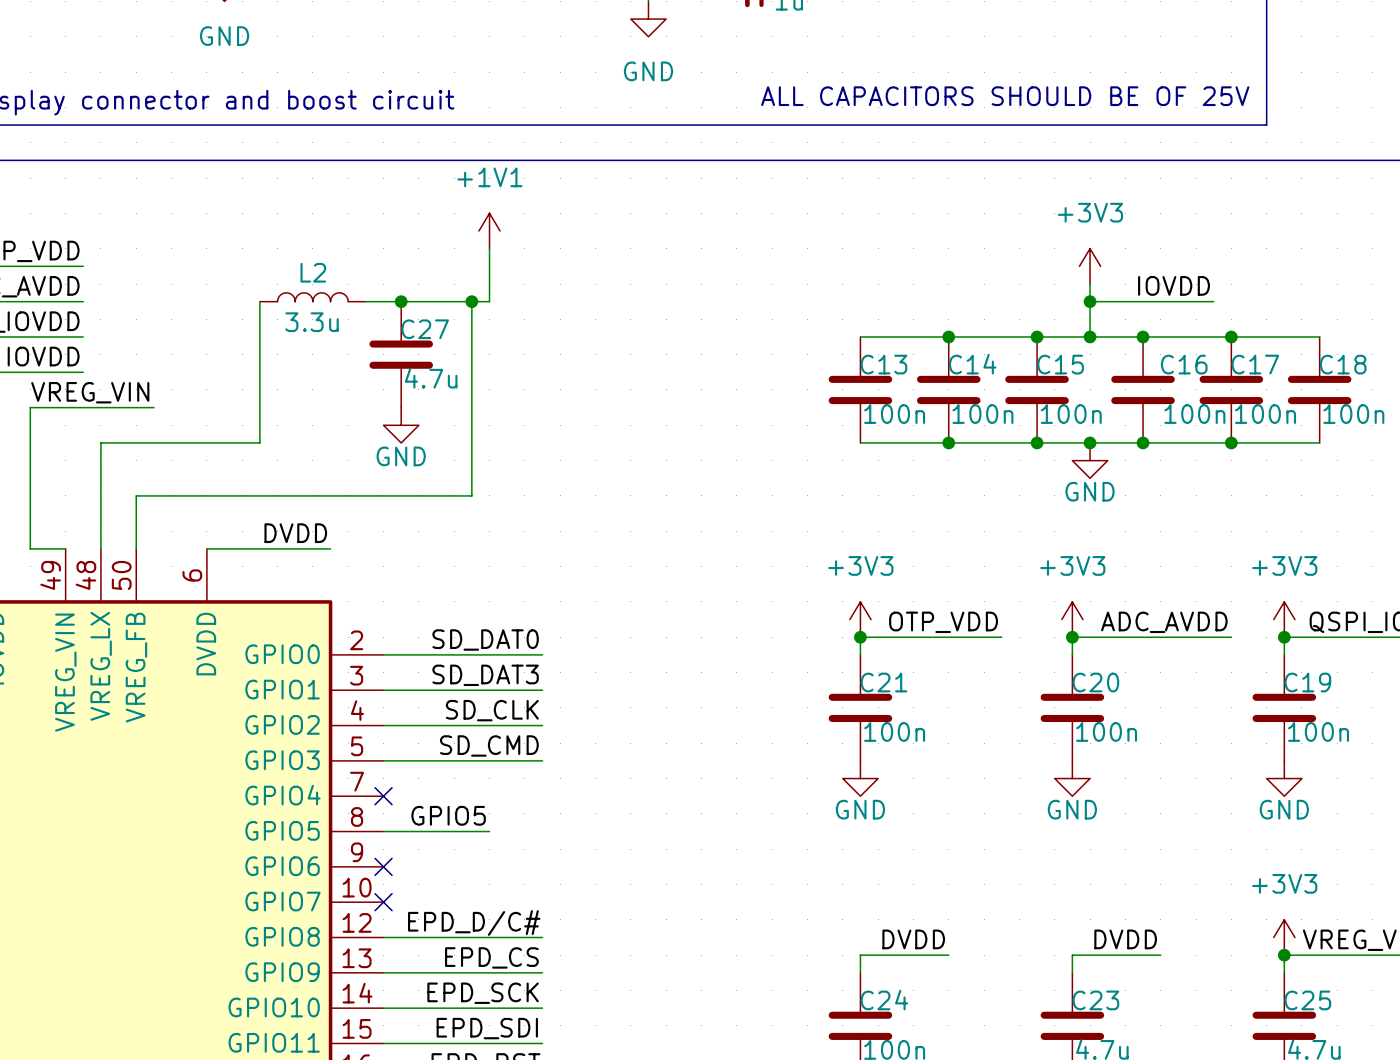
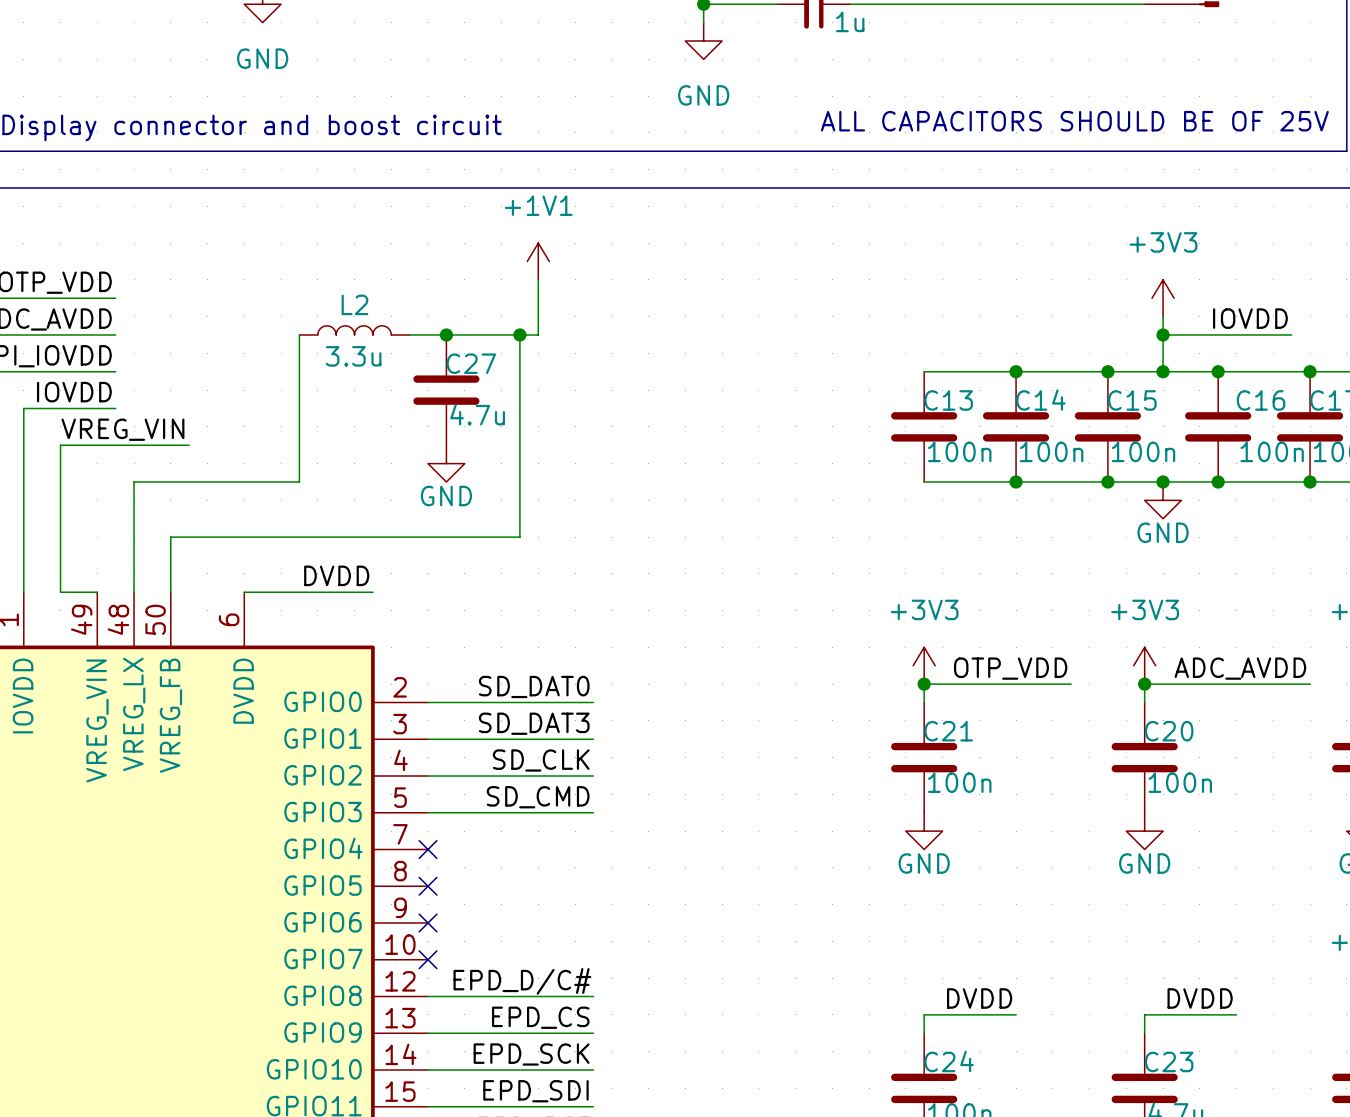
label: GPIO5 (448, 815) -> none
wire: (383, 831) (489, 831) -> none
no-connect mark: none -> (428, 886)

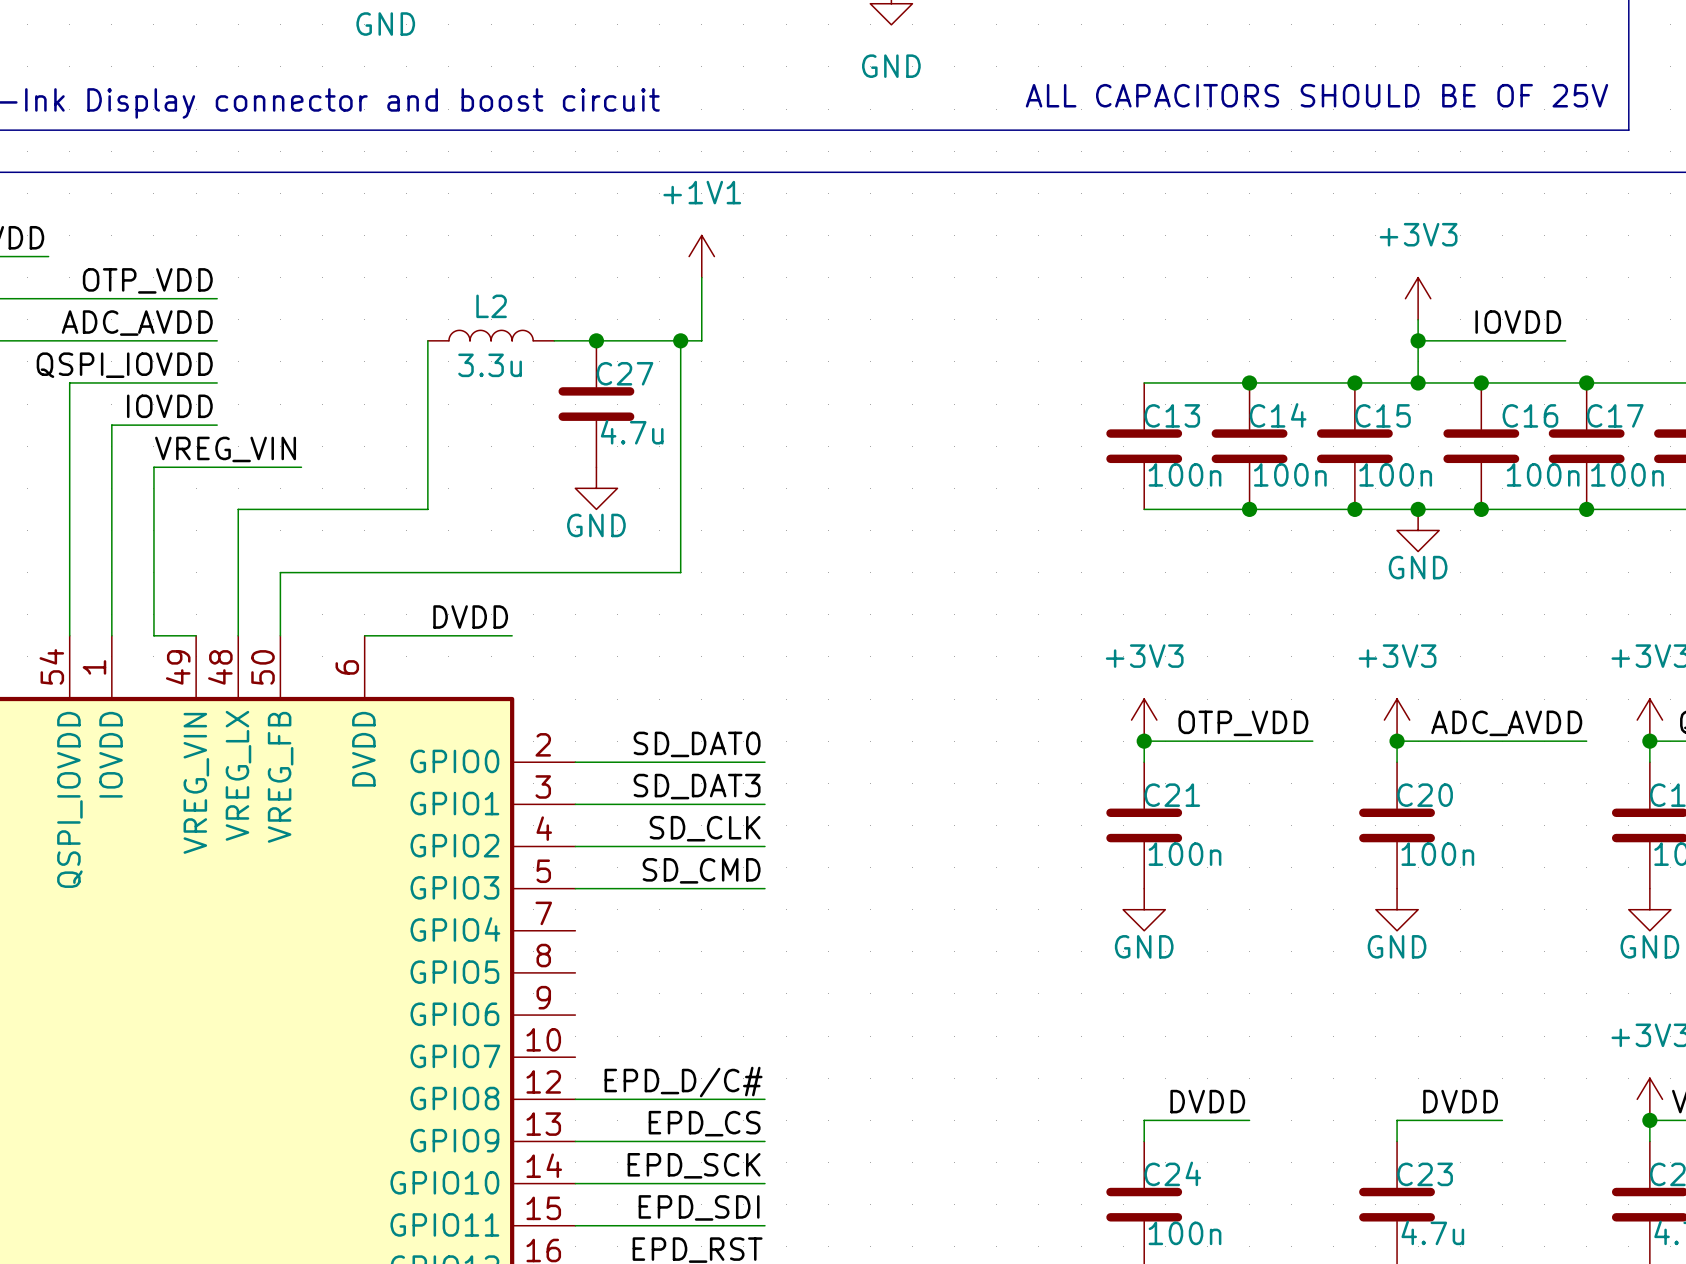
no-connect mark: (428, 849) -> none
no-connect mark: (428, 886) -> none
no-connect mark: (428, 923) -> none
no-connect mark: (428, 959) -> none

